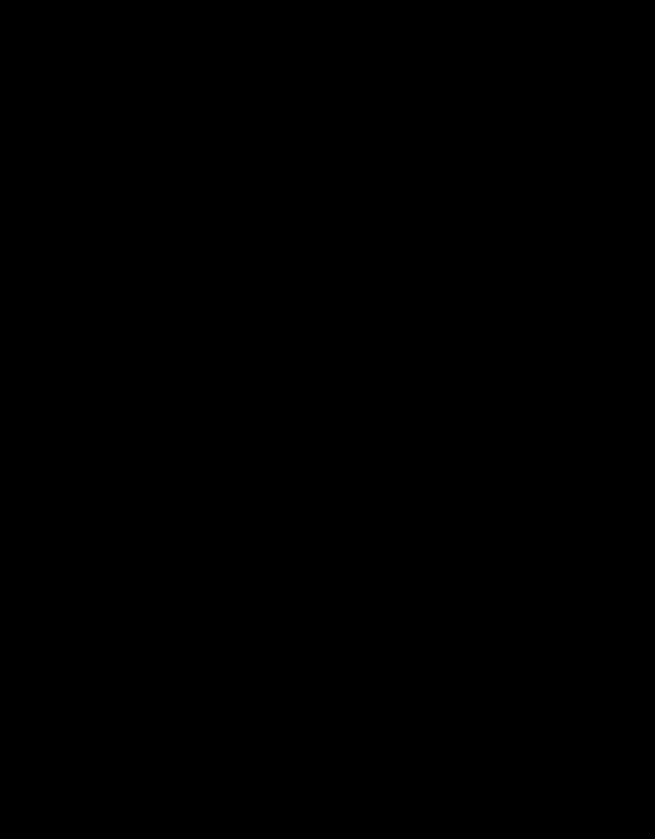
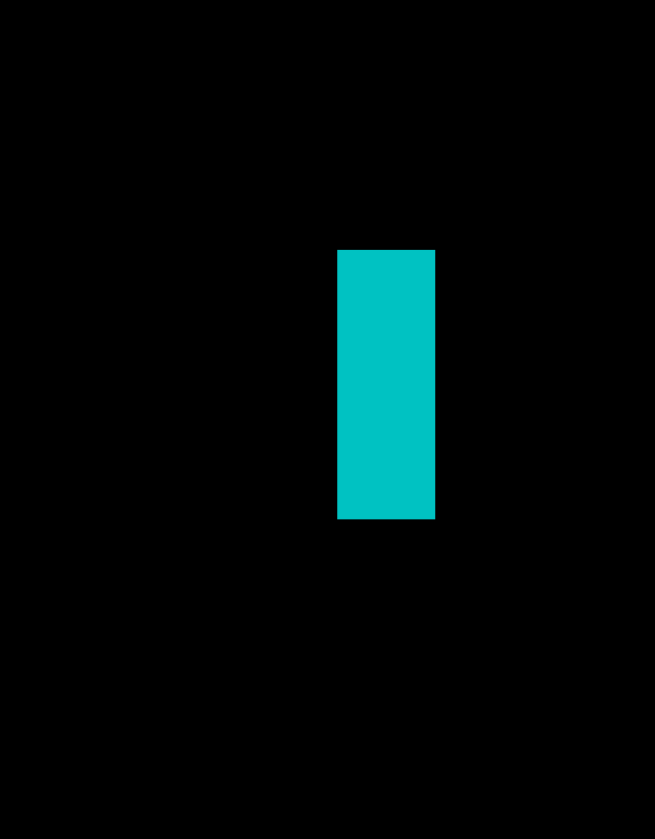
drawing: none -> [337, 249, 436, 520]

